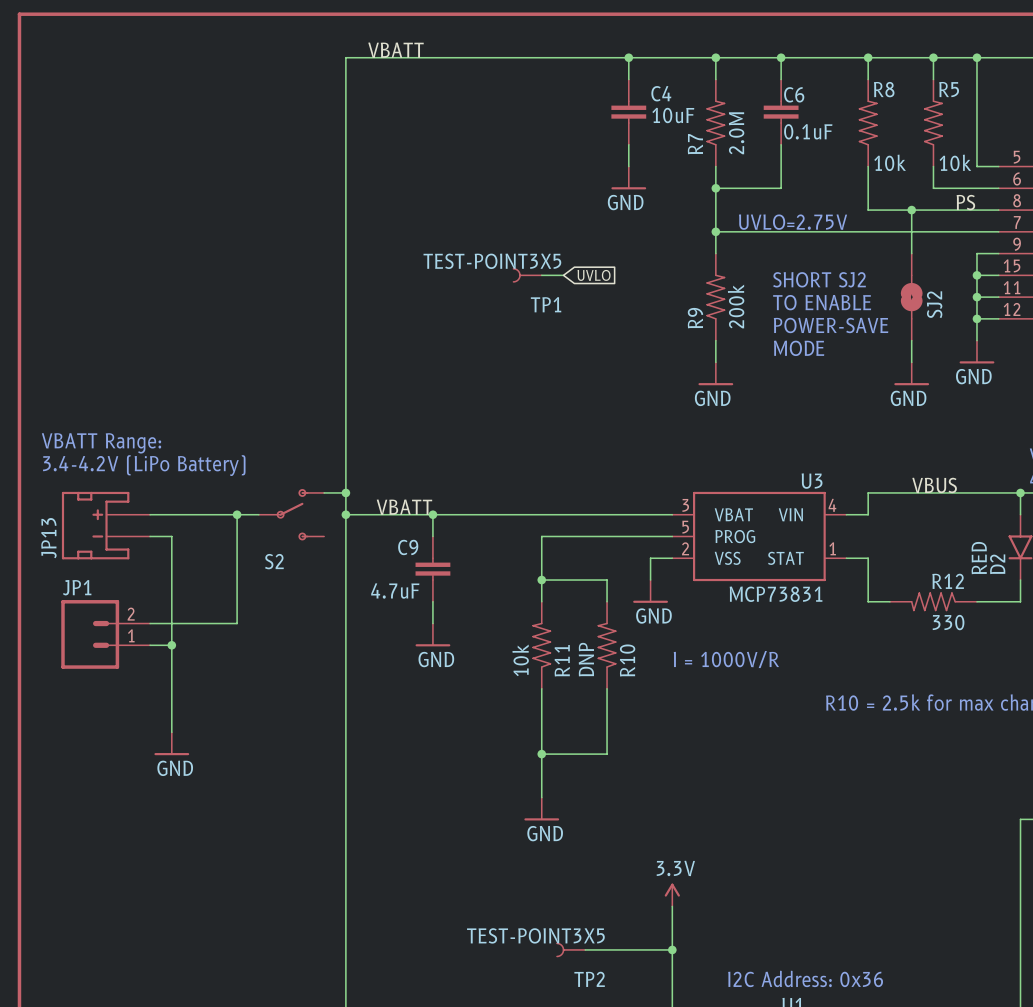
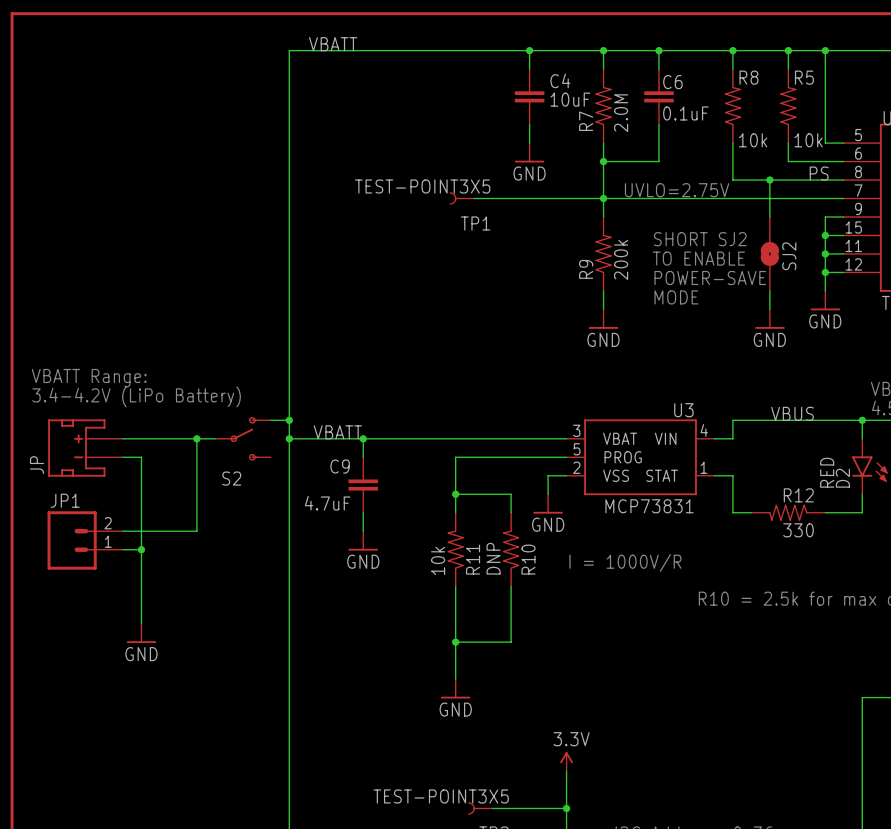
wire: none -> (474, 198) (603, 198)
TP1 position: (527, 275) -> (462, 198)
wire: (541, 275) (563, 275) -> none
global label: UVLO (594, 275) -> none
JP13 name: JP13 (48, 538) -> JP (37, 465)

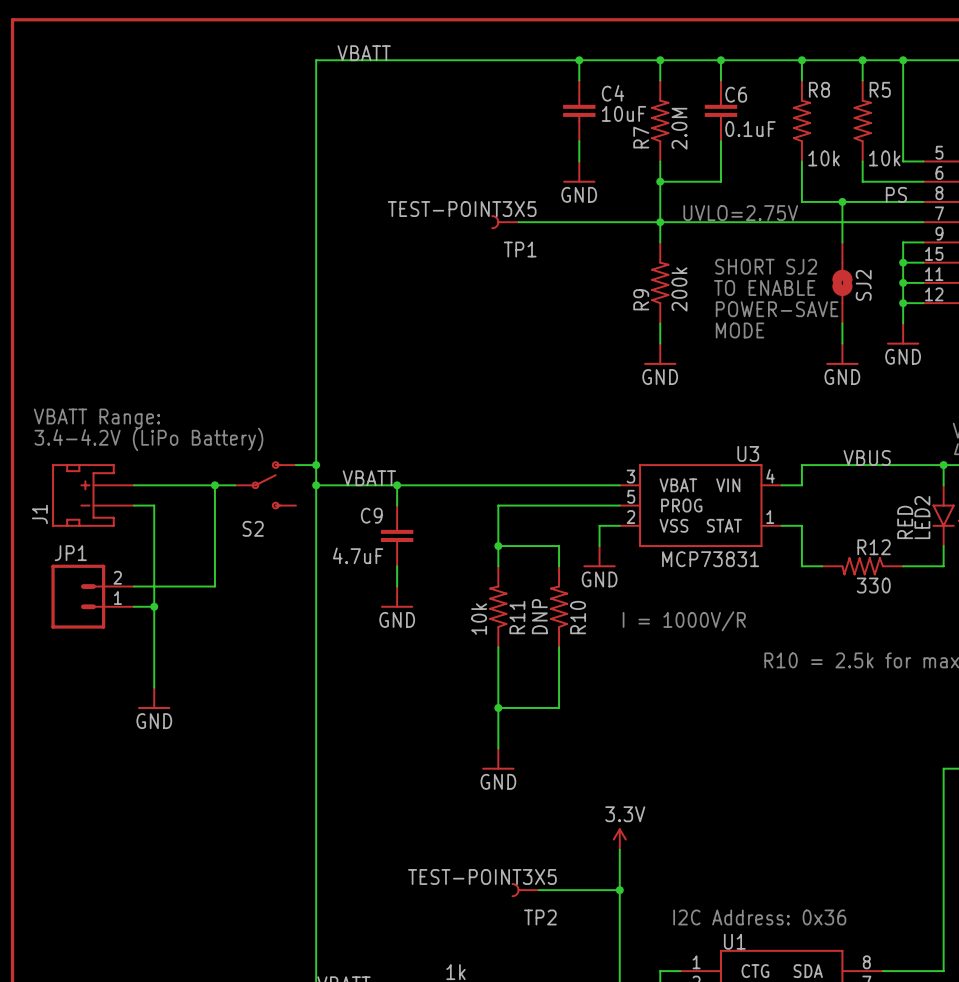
JP name: JP (37, 465) -> J1 (39, 514)
D2 name: D2 (842, 478) -> LED2 (922, 517)

